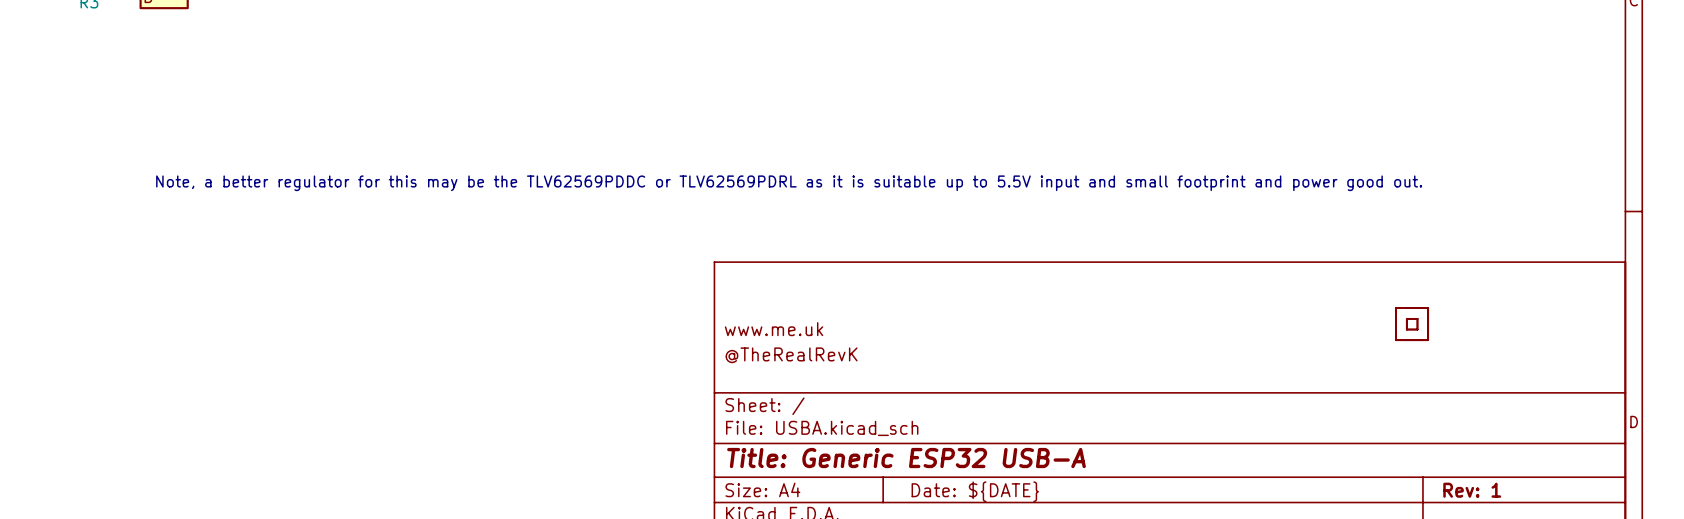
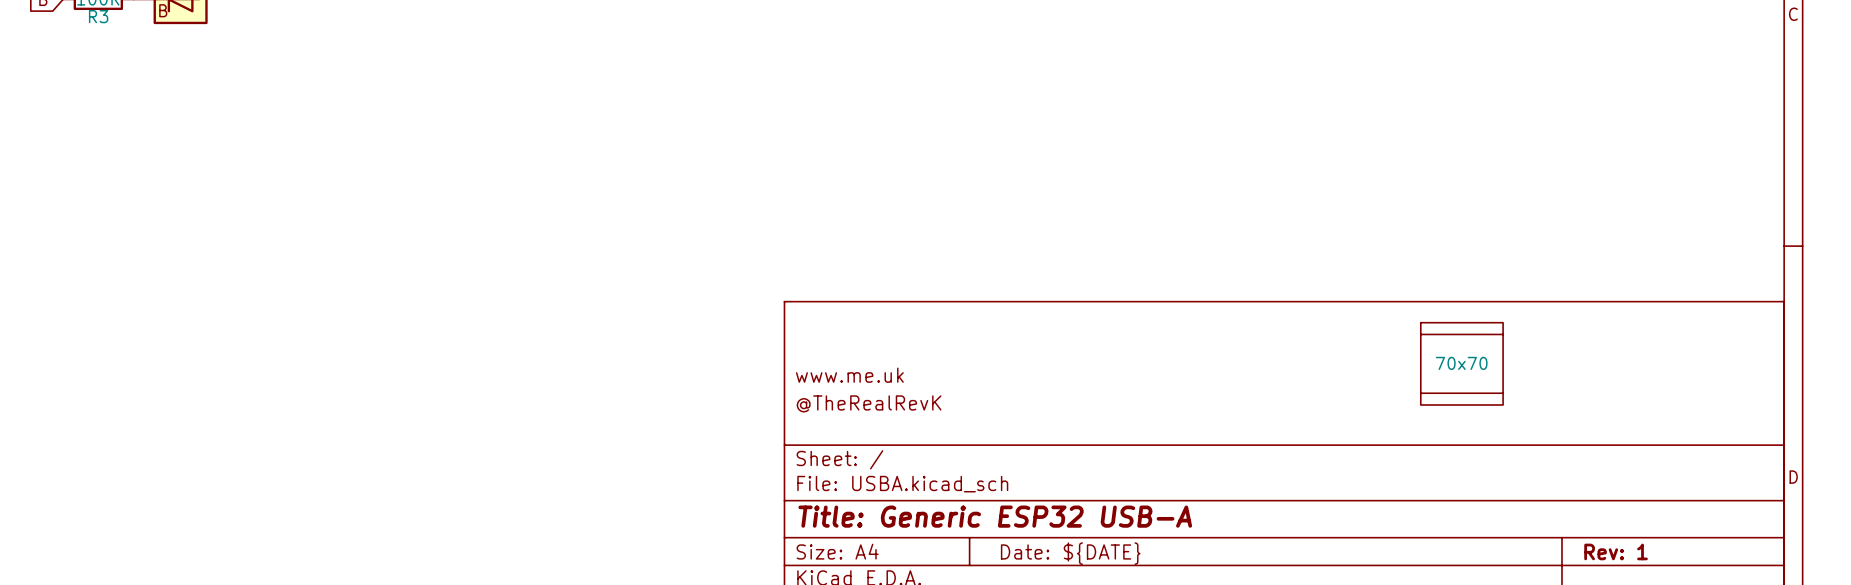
text: Note, a better regulator for this may be the TLV62569PDDC or TLV62569PDRL as it is suitable up to 5.5V input and small footprint and power good out. (789, 183) -> none
part: none -> (1461, 334)
part: none -> 70x70 (1461, 363)
part: (1412, 324) -> none
part: none -> (1461, 393)

